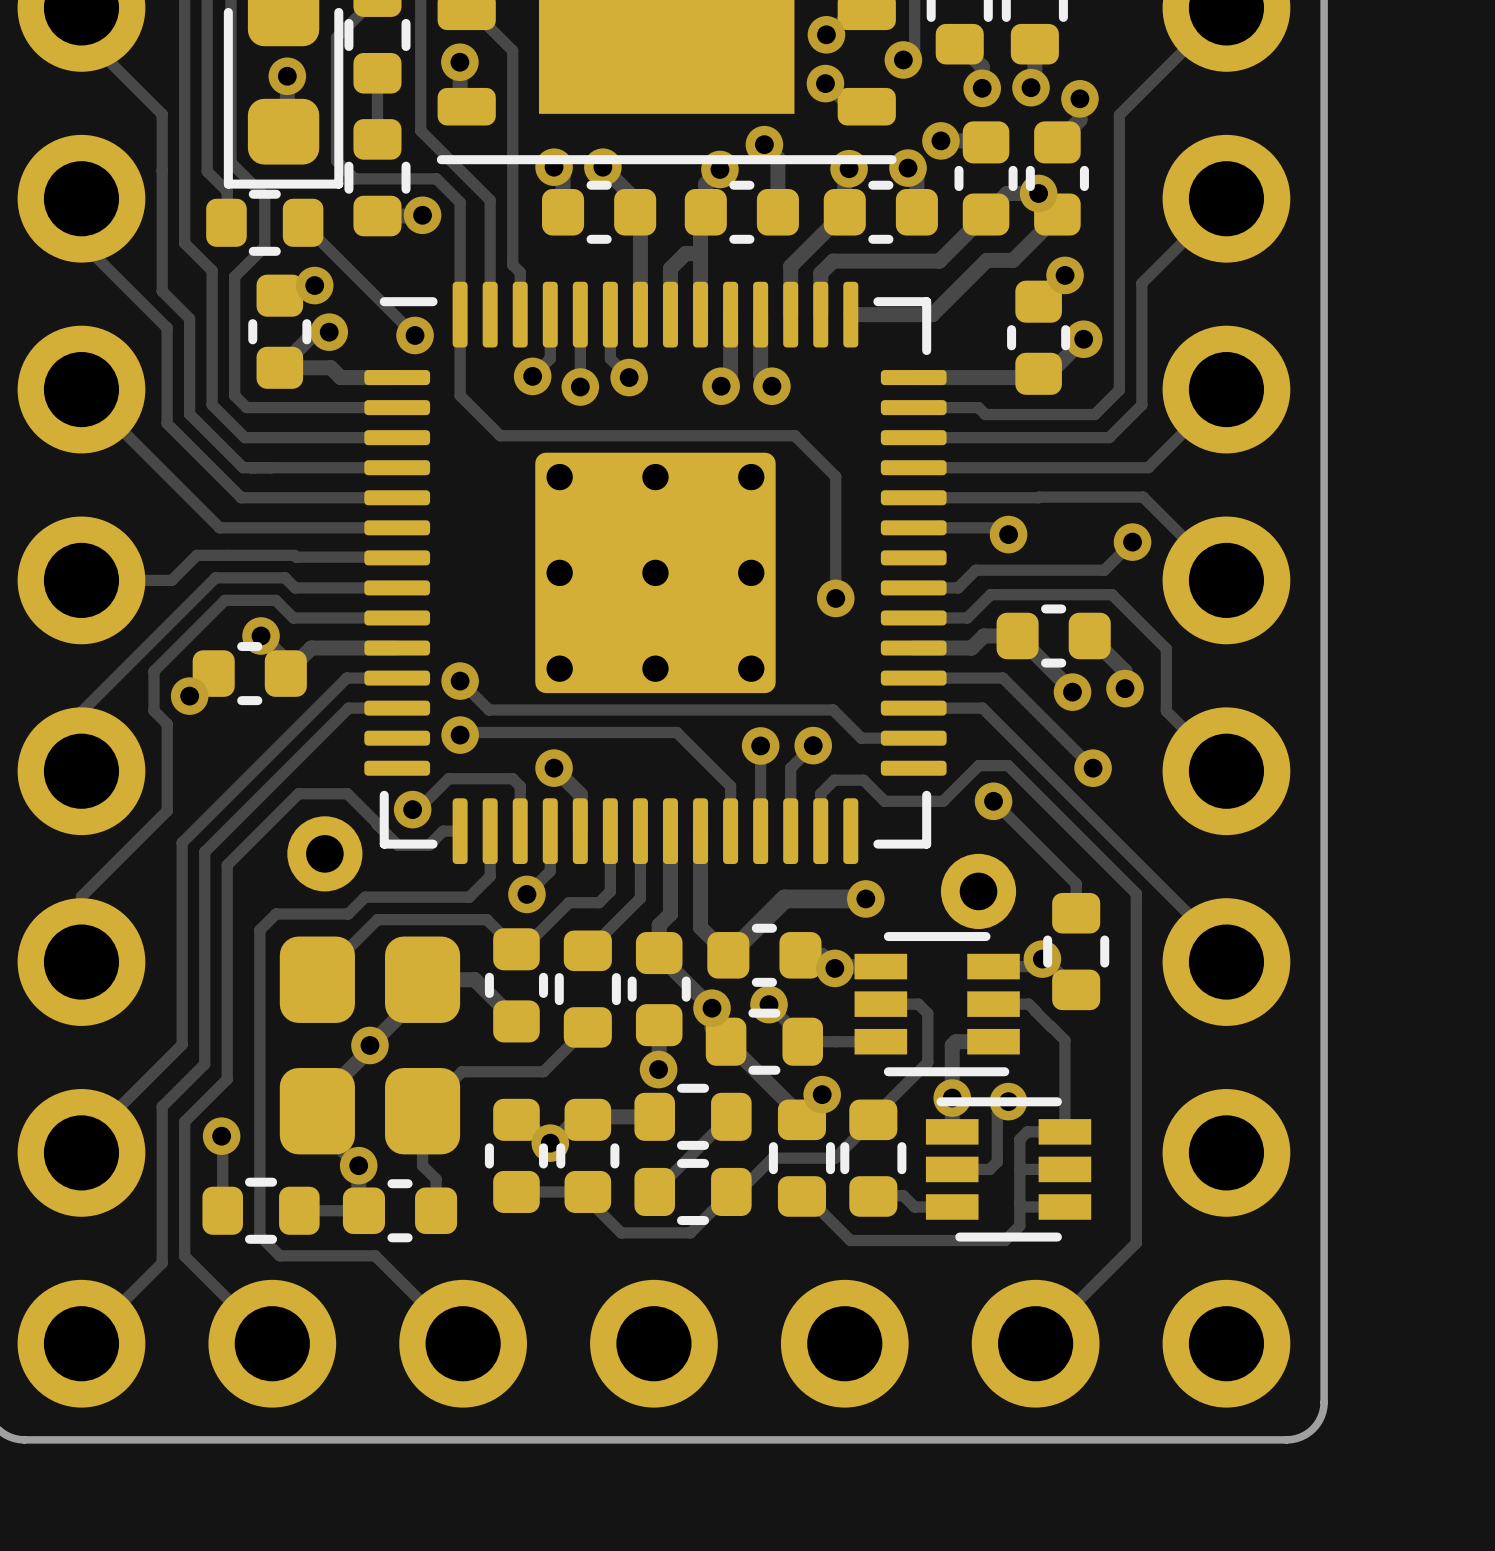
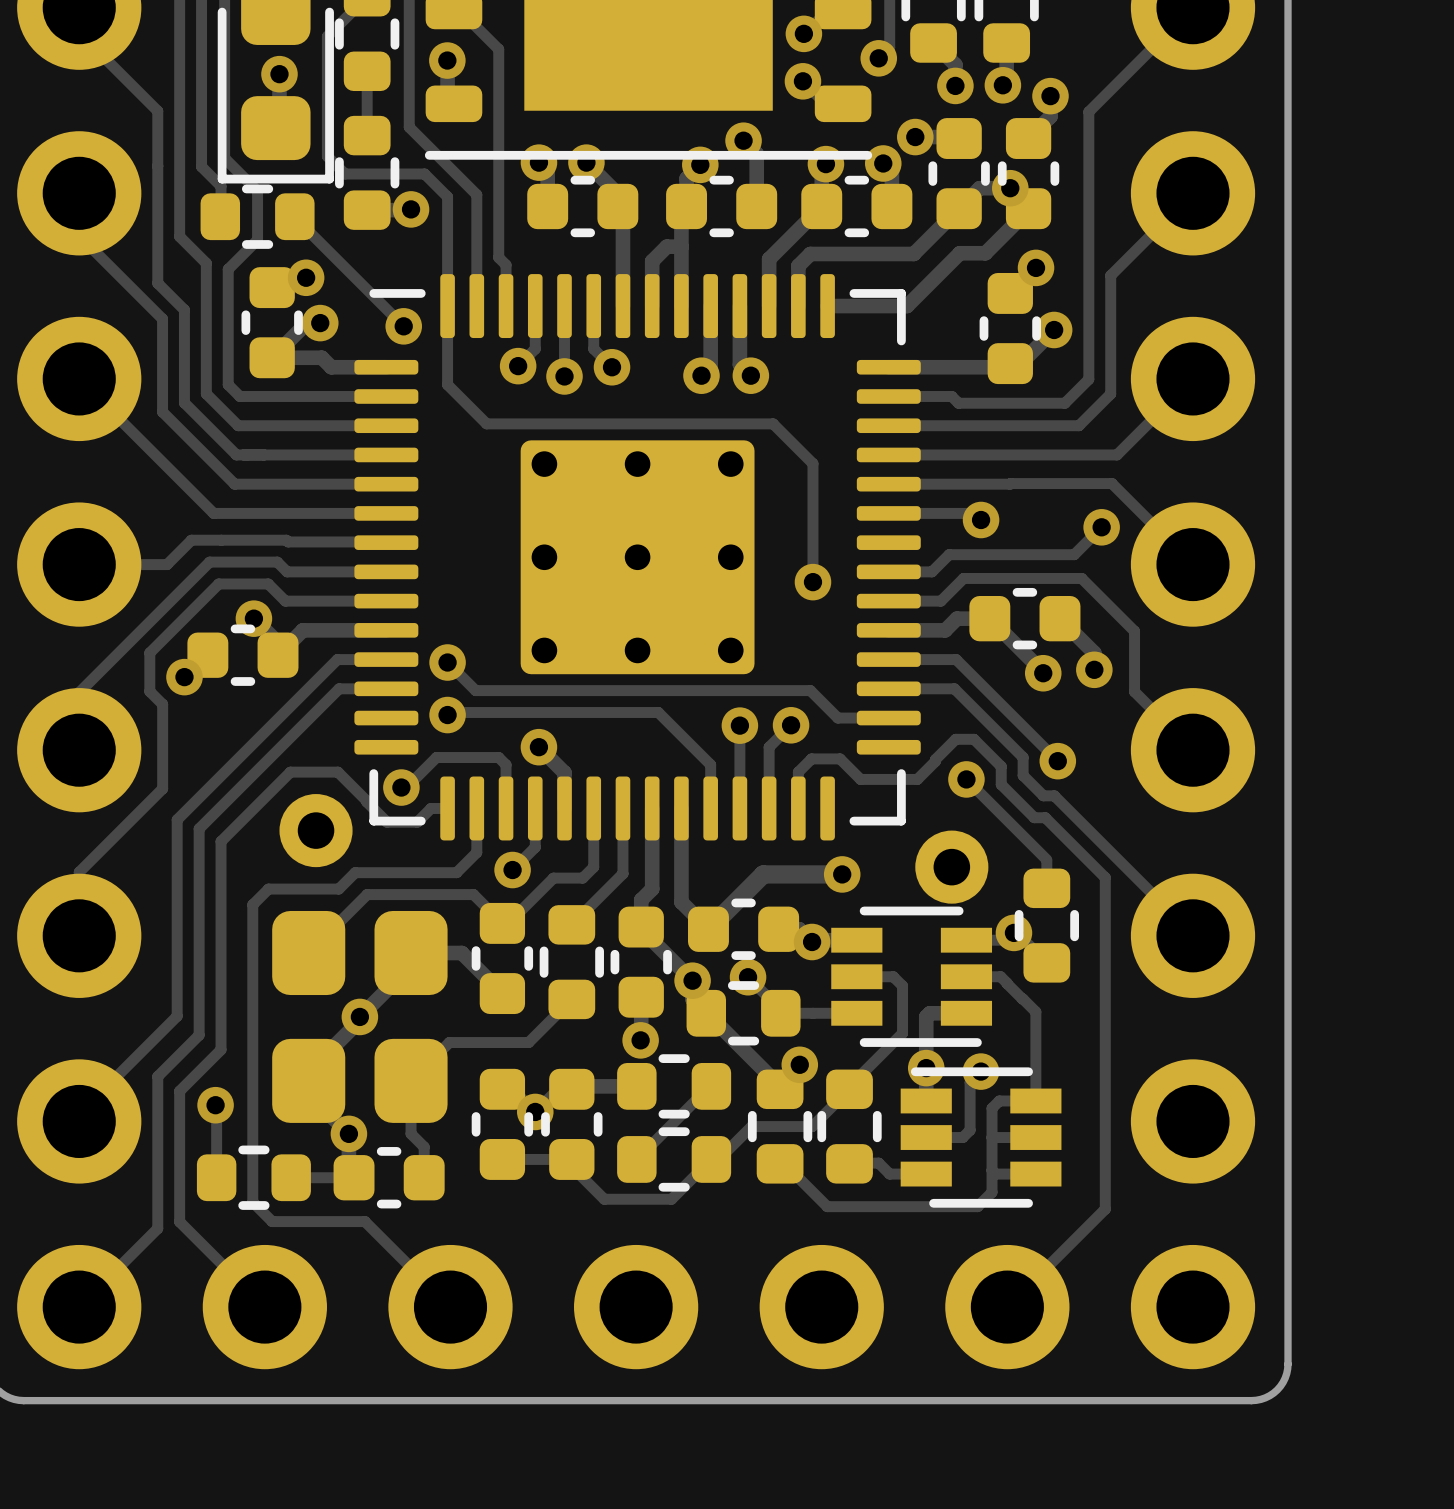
track: (983, 678) (1002, 678) (1093, 768) -> (956, 659) (1057, 761)
track: (982, 708) (1226, 951) (1226, 960) -> (954, 688) (1023, 757) (1023, 775) (1043, 795) (1054, 795) (1193, 934)
via position: (1093, 768) -> (1057, 761)
track: (961, 782) (978, 765) (1008, 765) (1136, 893) (1136, 902) -> (935, 761) (955, 739) (974, 739) (1001, 766) (1001, 784) (1034, 817) (1045, 817) (1105, 877)

